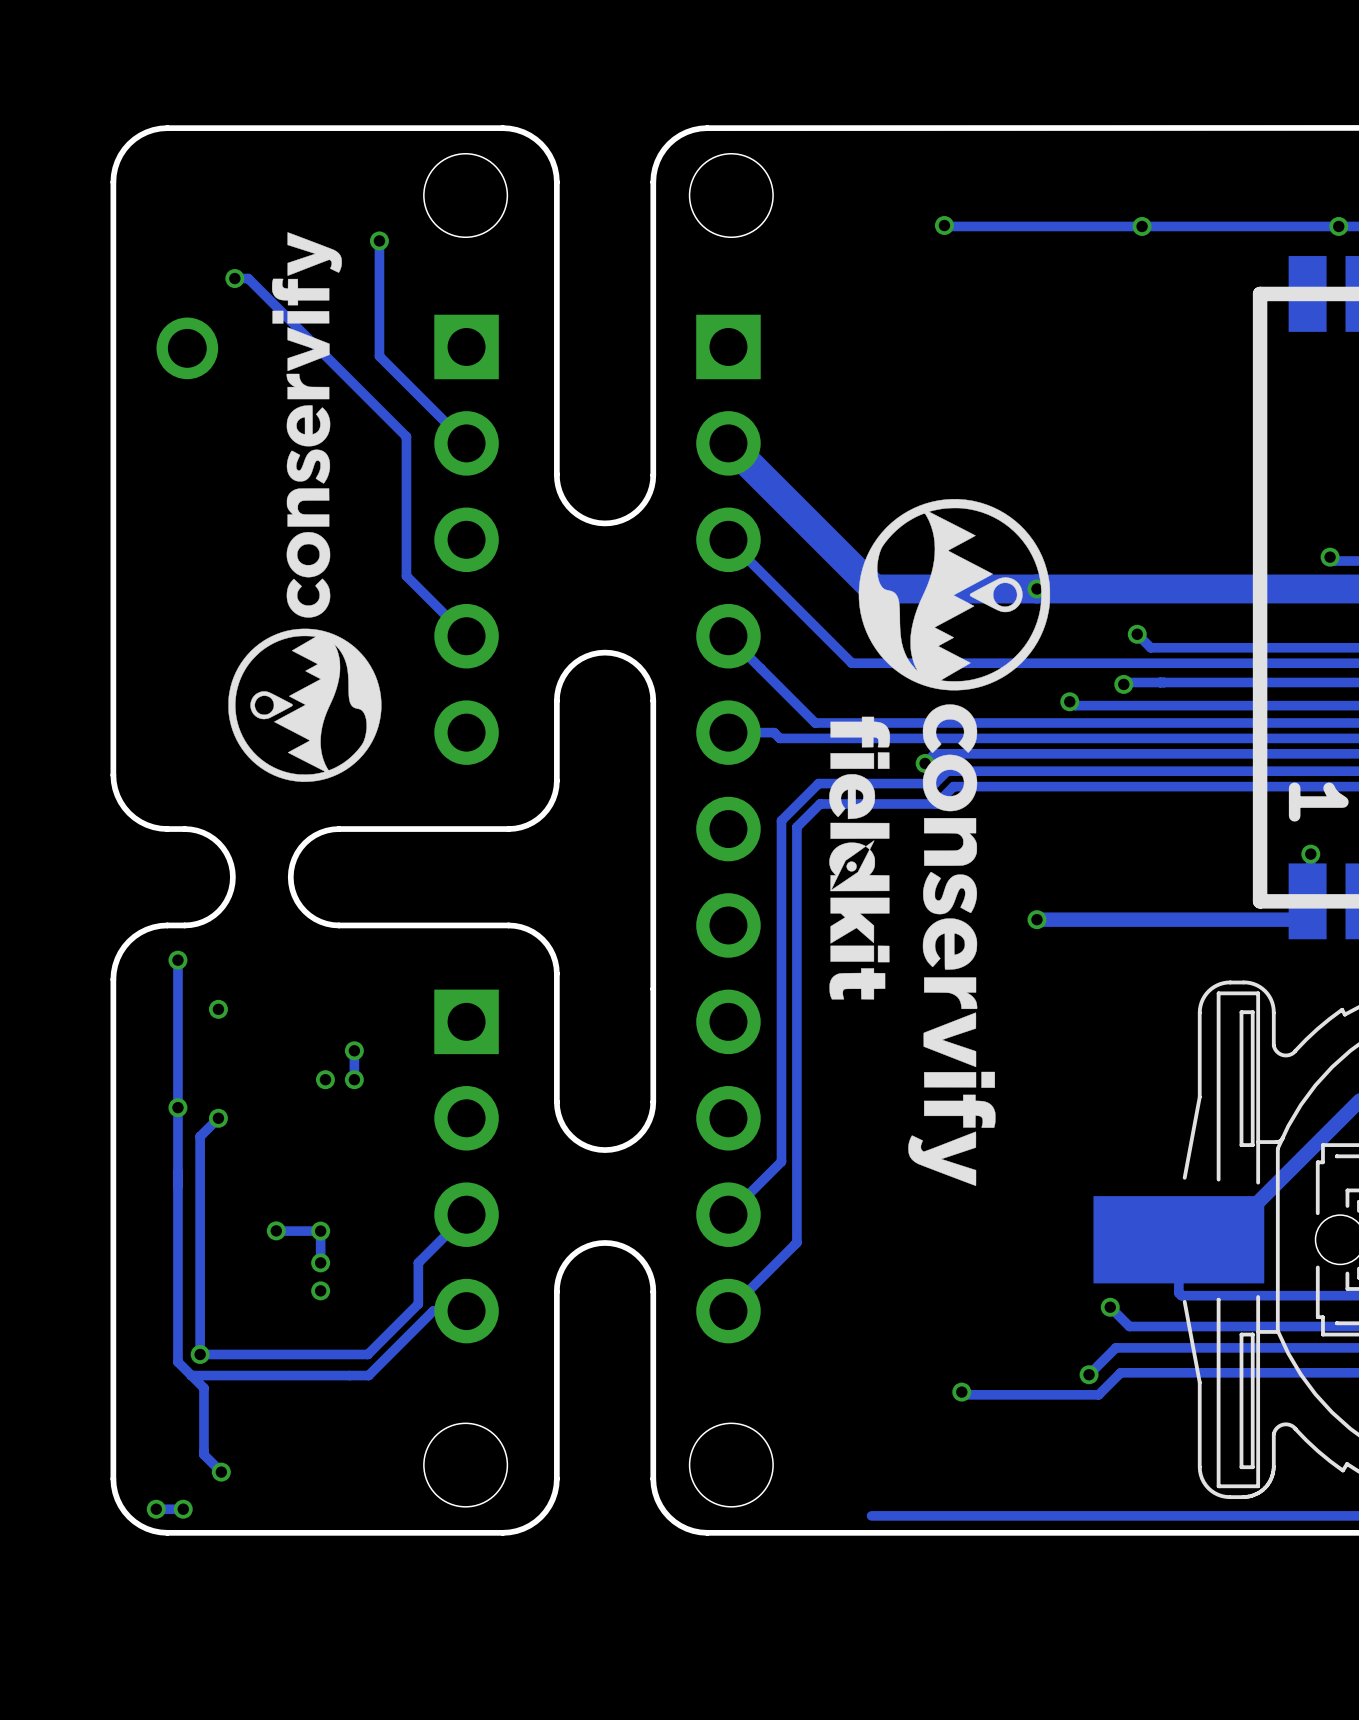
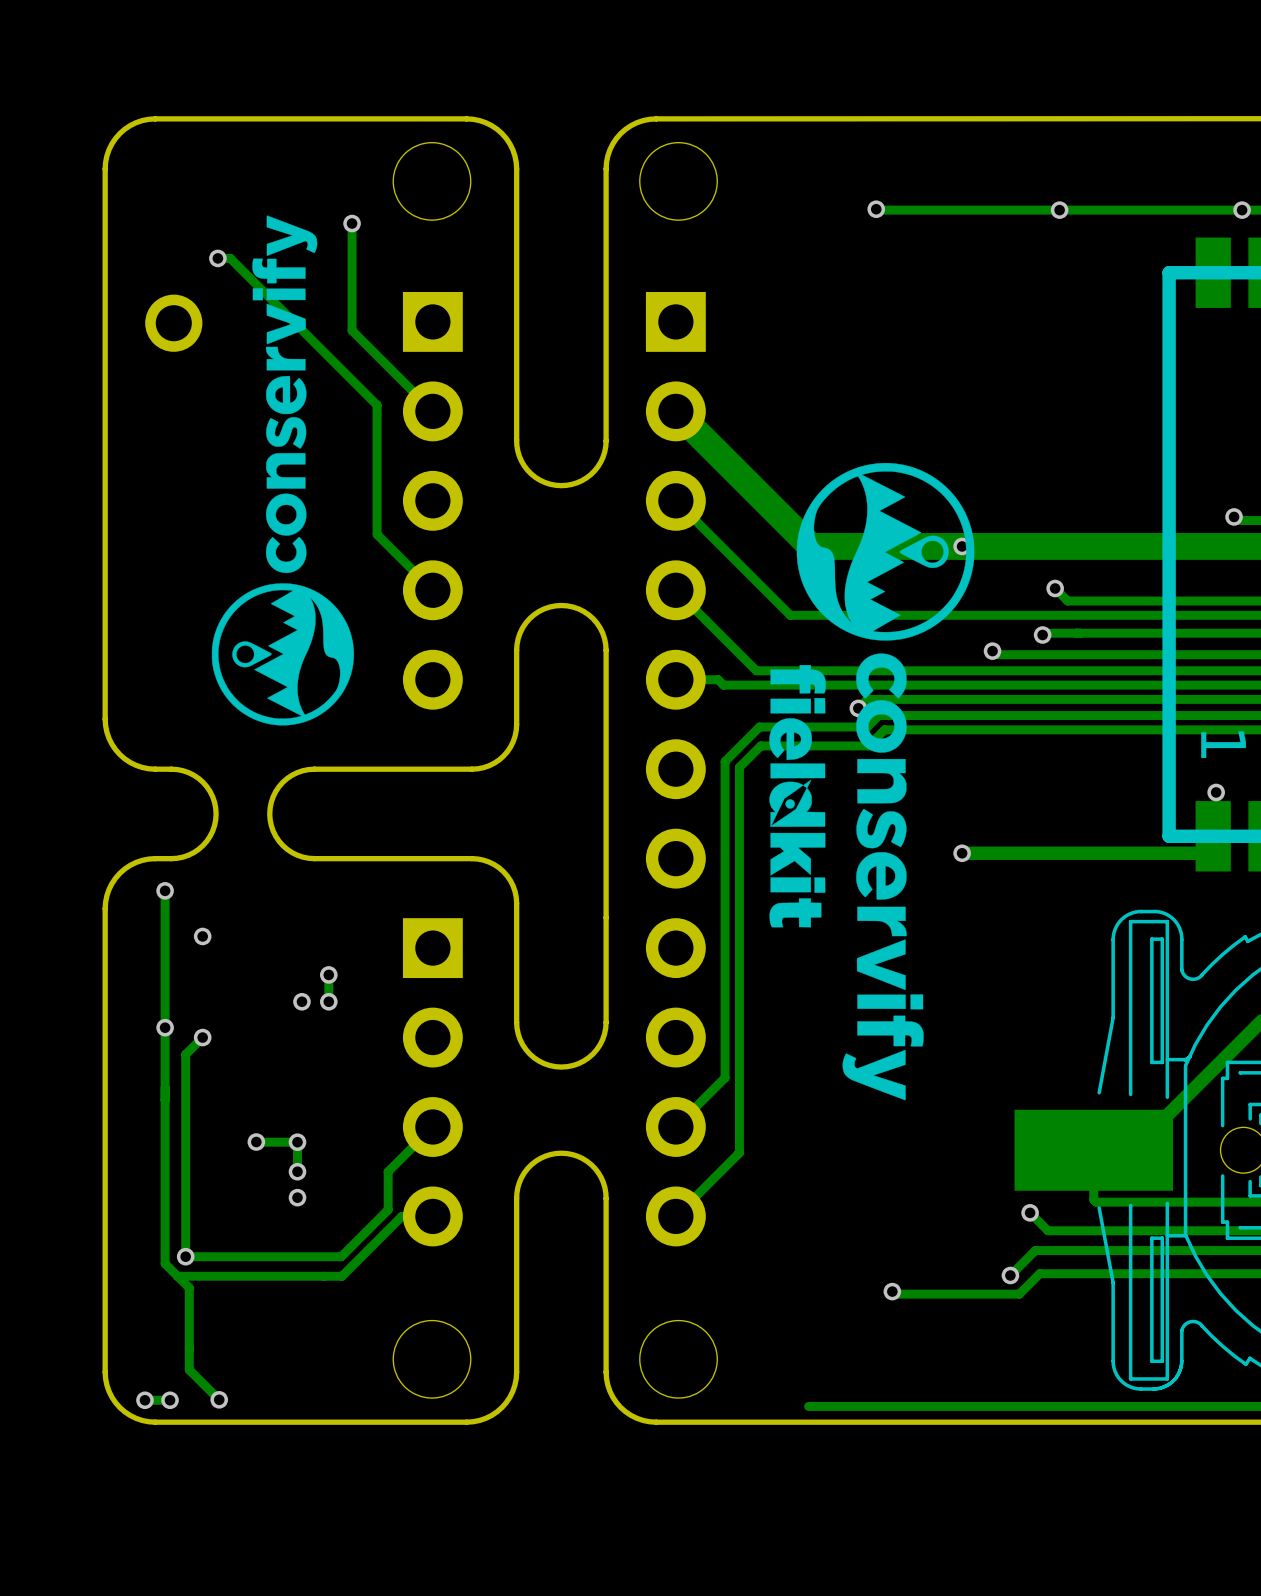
track: (203, 1454) (221, 1472) -> (189, 1349) (189, 1369) (219, 1399)
via position: (221, 1472) -> (219, 1399)

